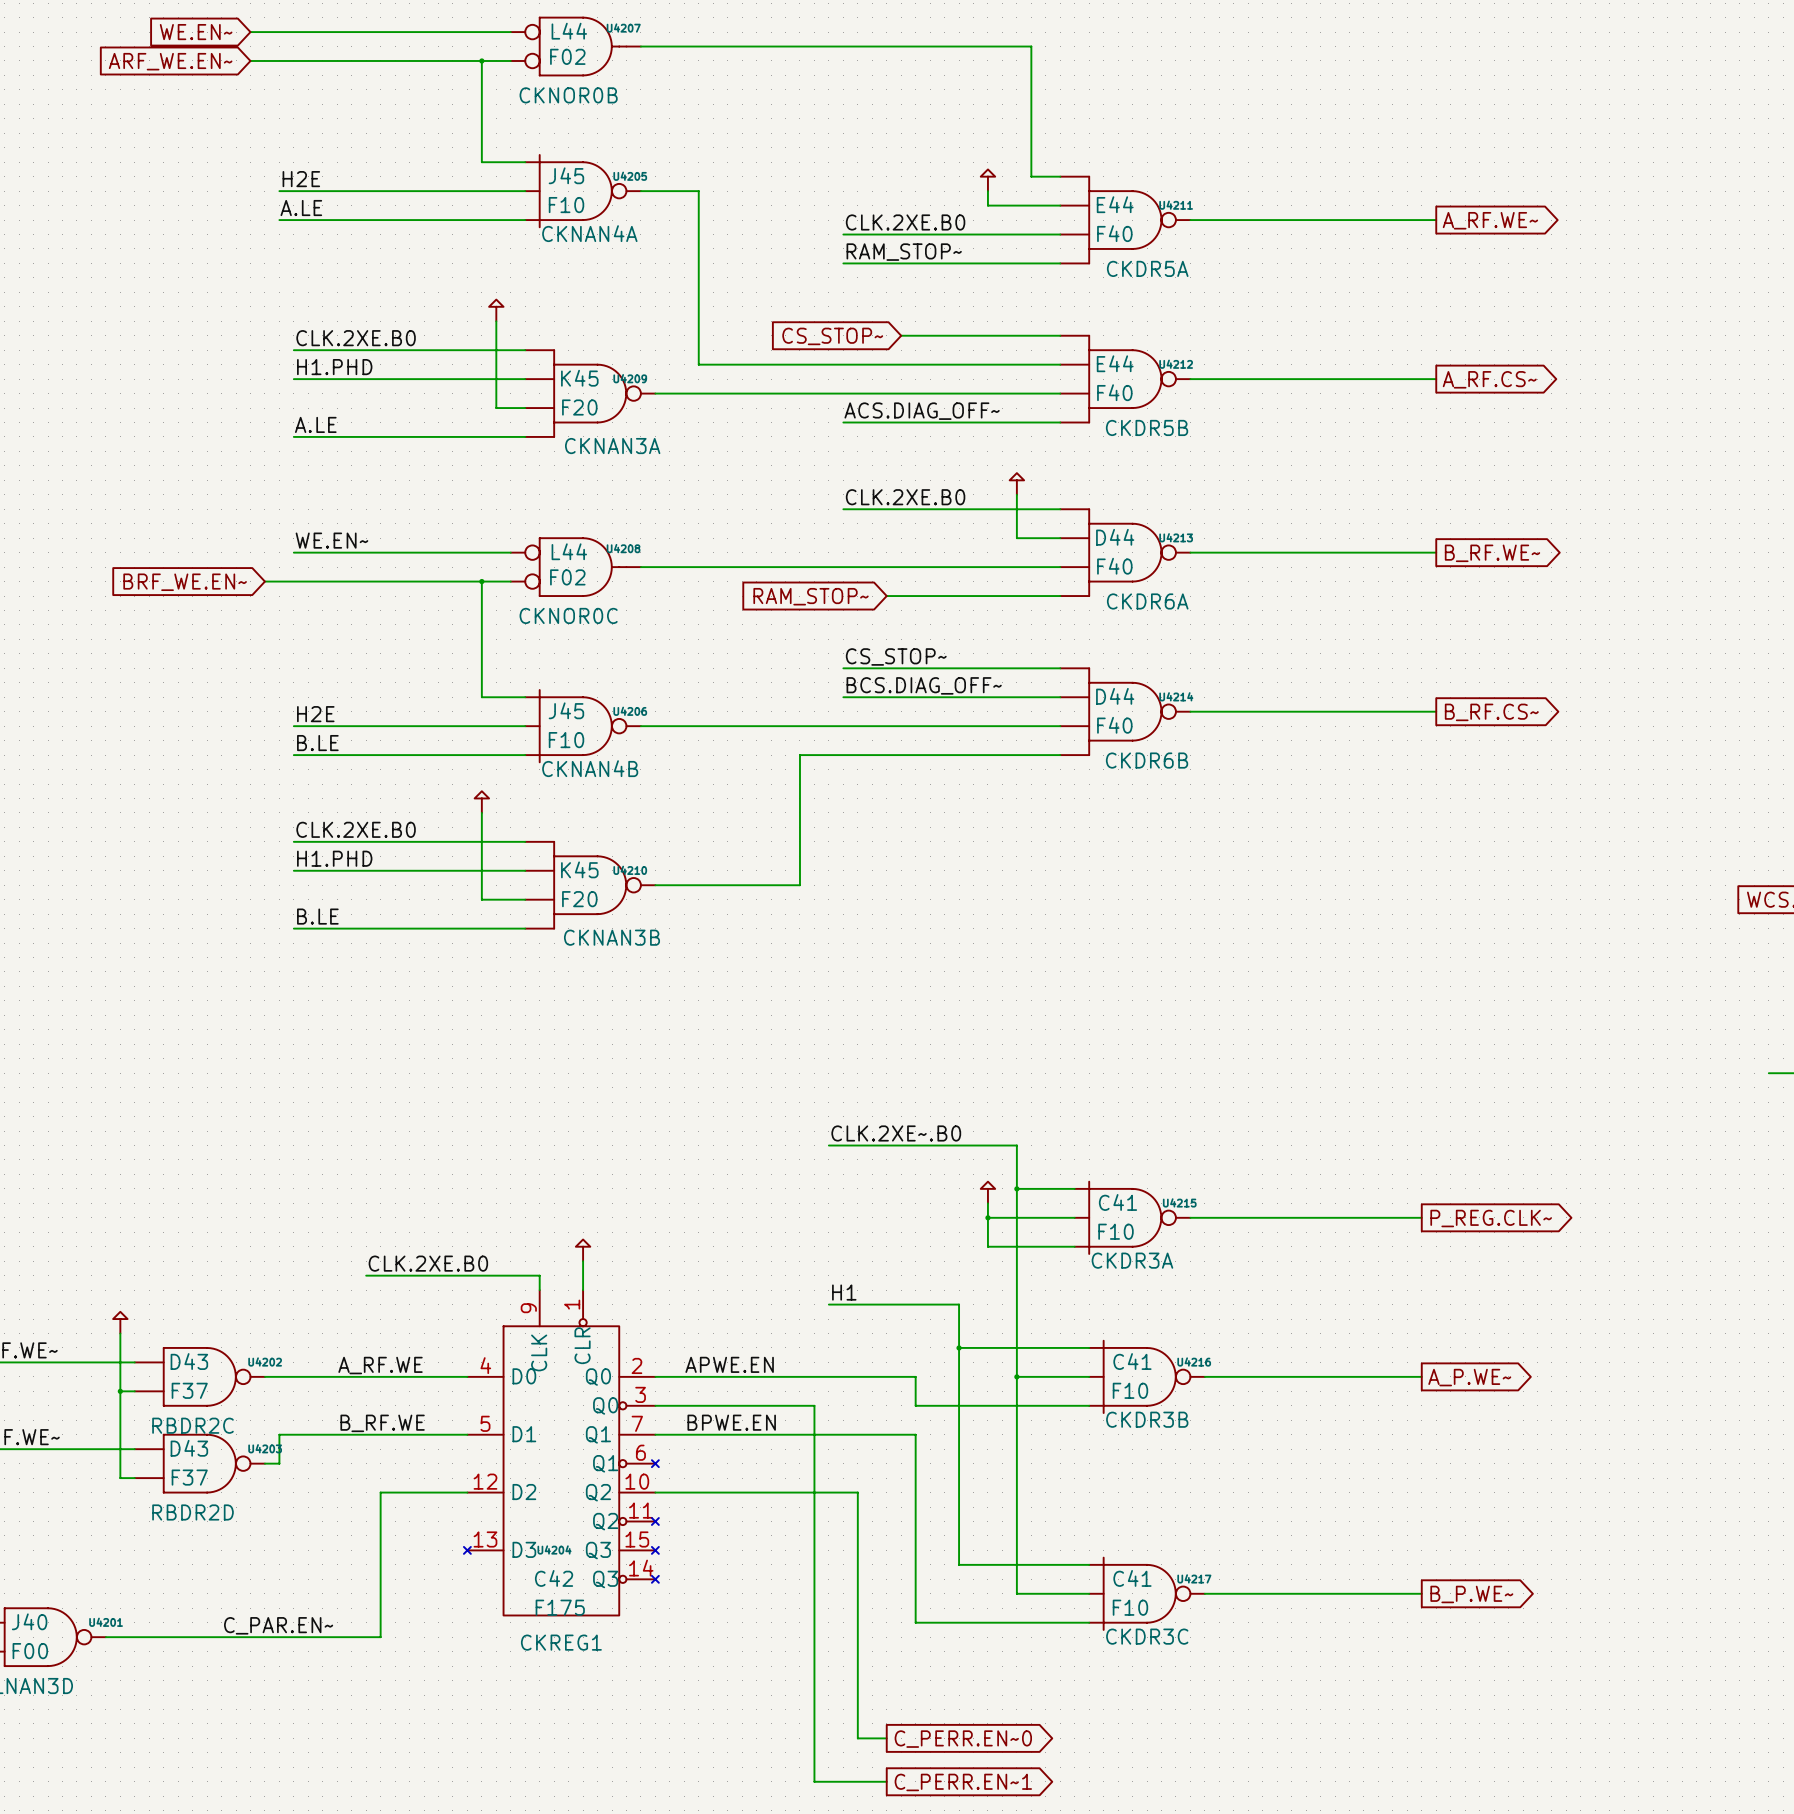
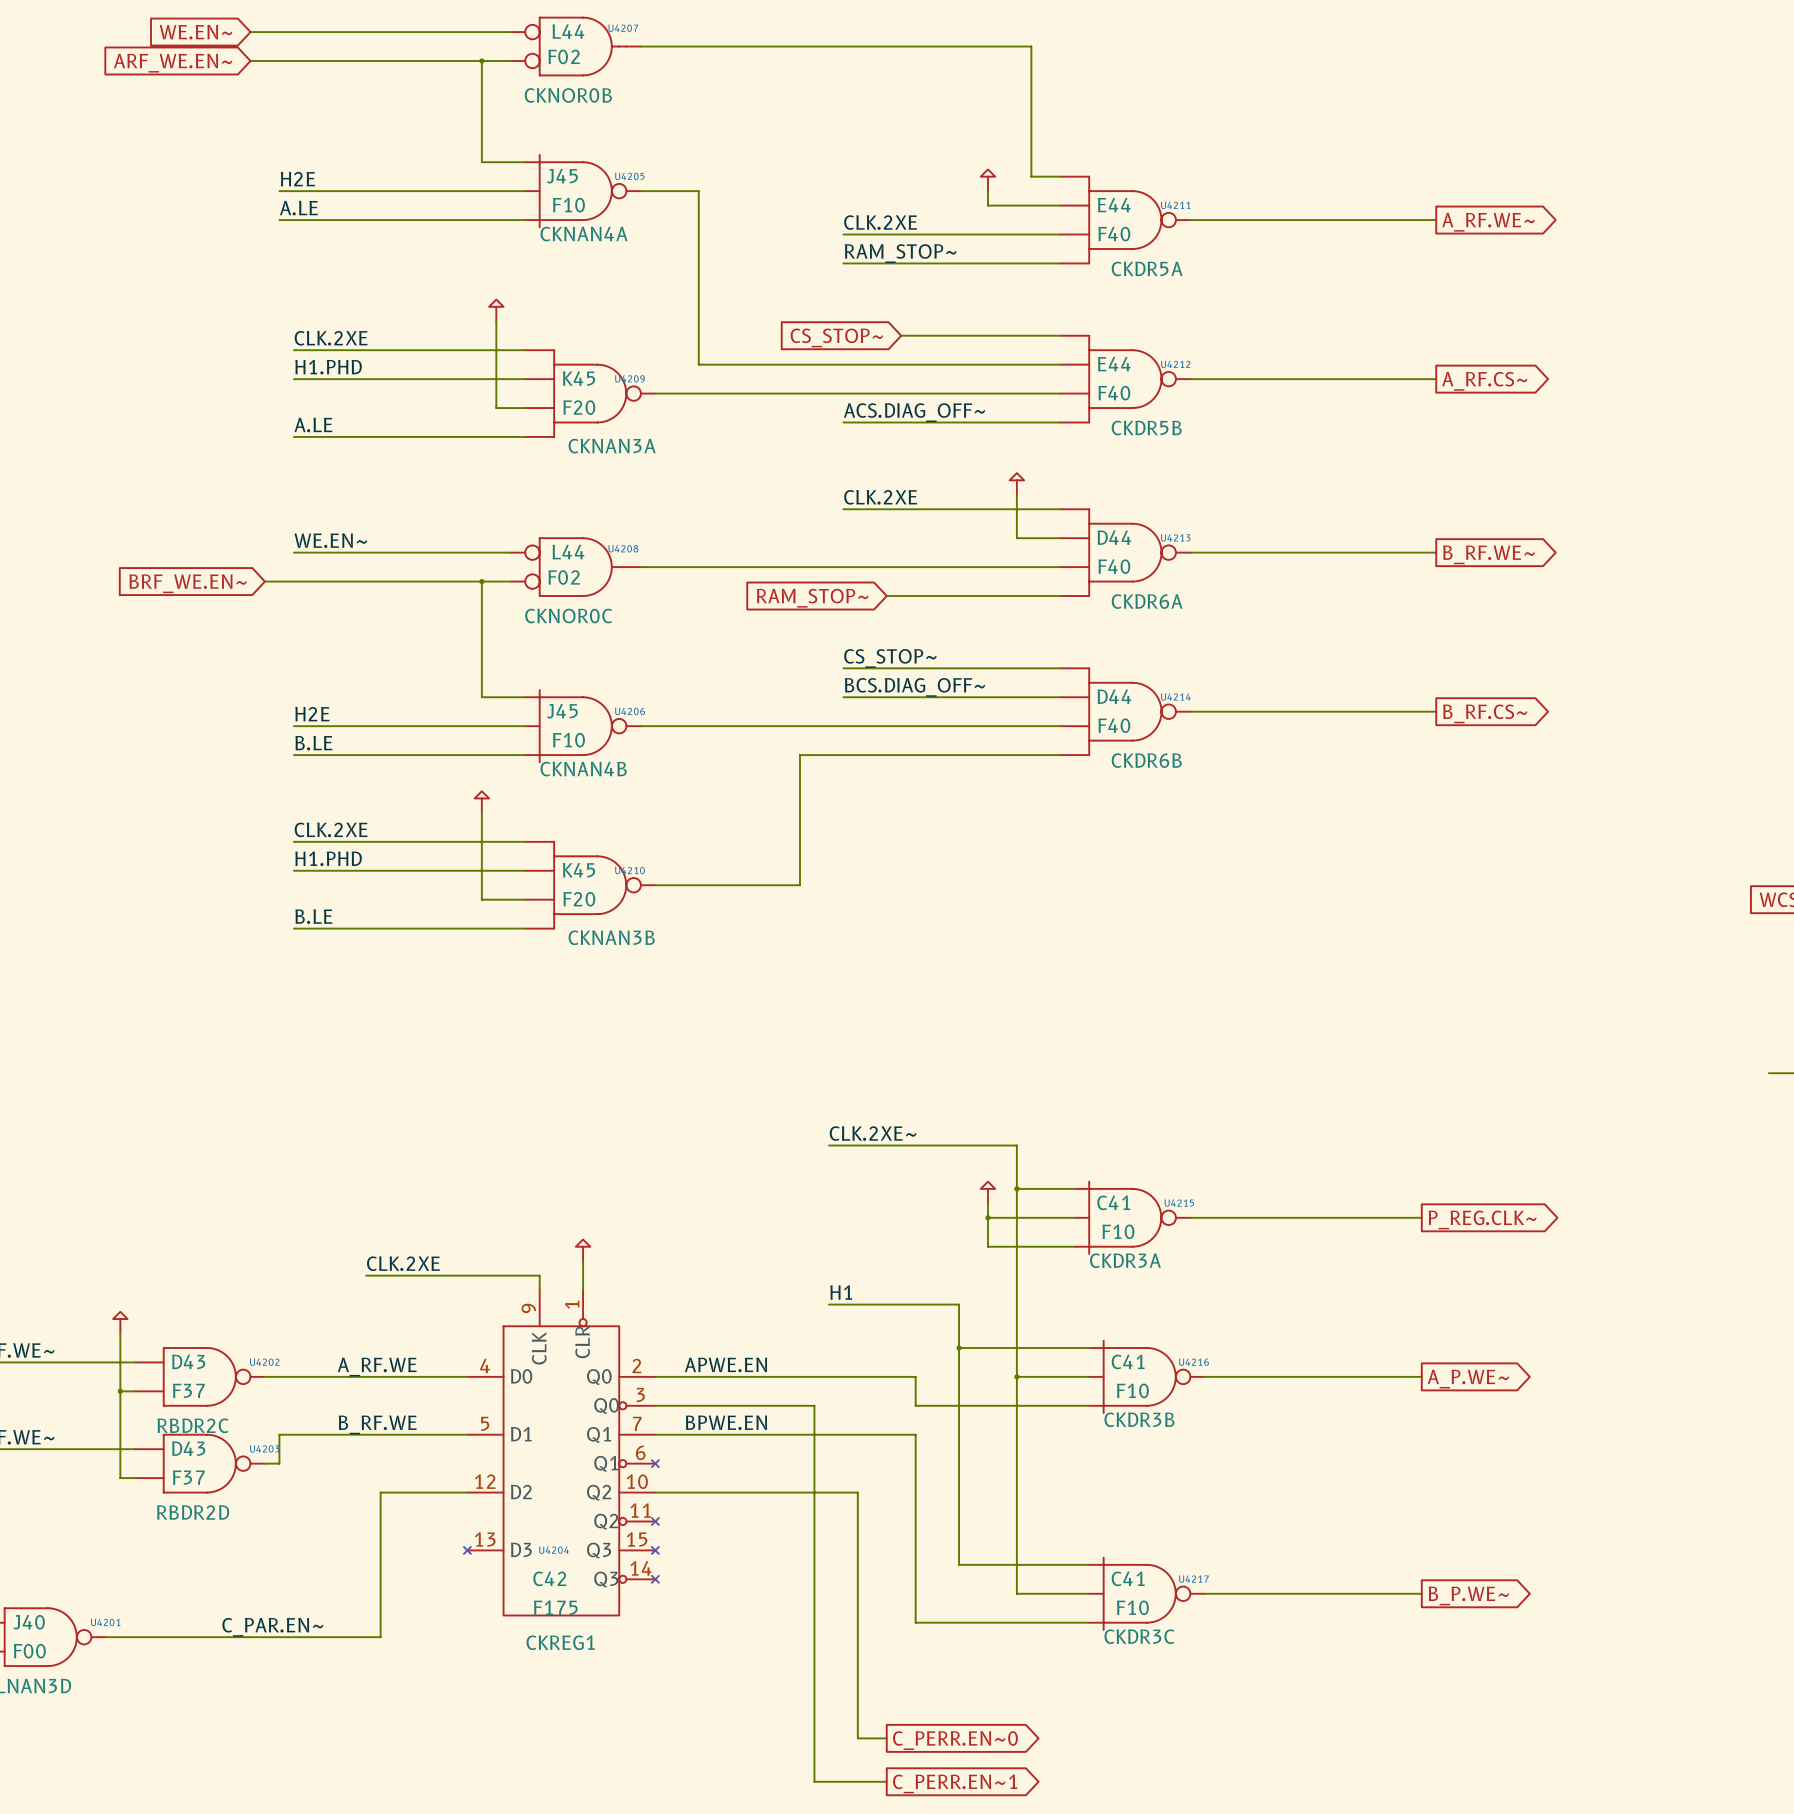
label: CLK.2XE.B0 (905, 222) -> CLK.2XE (880, 222)
label: CLK.2XE.B0 (356, 338) -> CLK.2XE (331, 338)
label: CLK.2XE.B0 (905, 497) -> CLK.2XE (880, 497)
label: CLK.2XE.B0 (356, 829) -> CLK.2XE (331, 829)
label: CLK.2XE~.B0 (896, 1133) -> CLK.2XE~ (873, 1133)
label: CLK.2XE.B0 (428, 1263) -> CLK.2XE (403, 1263)

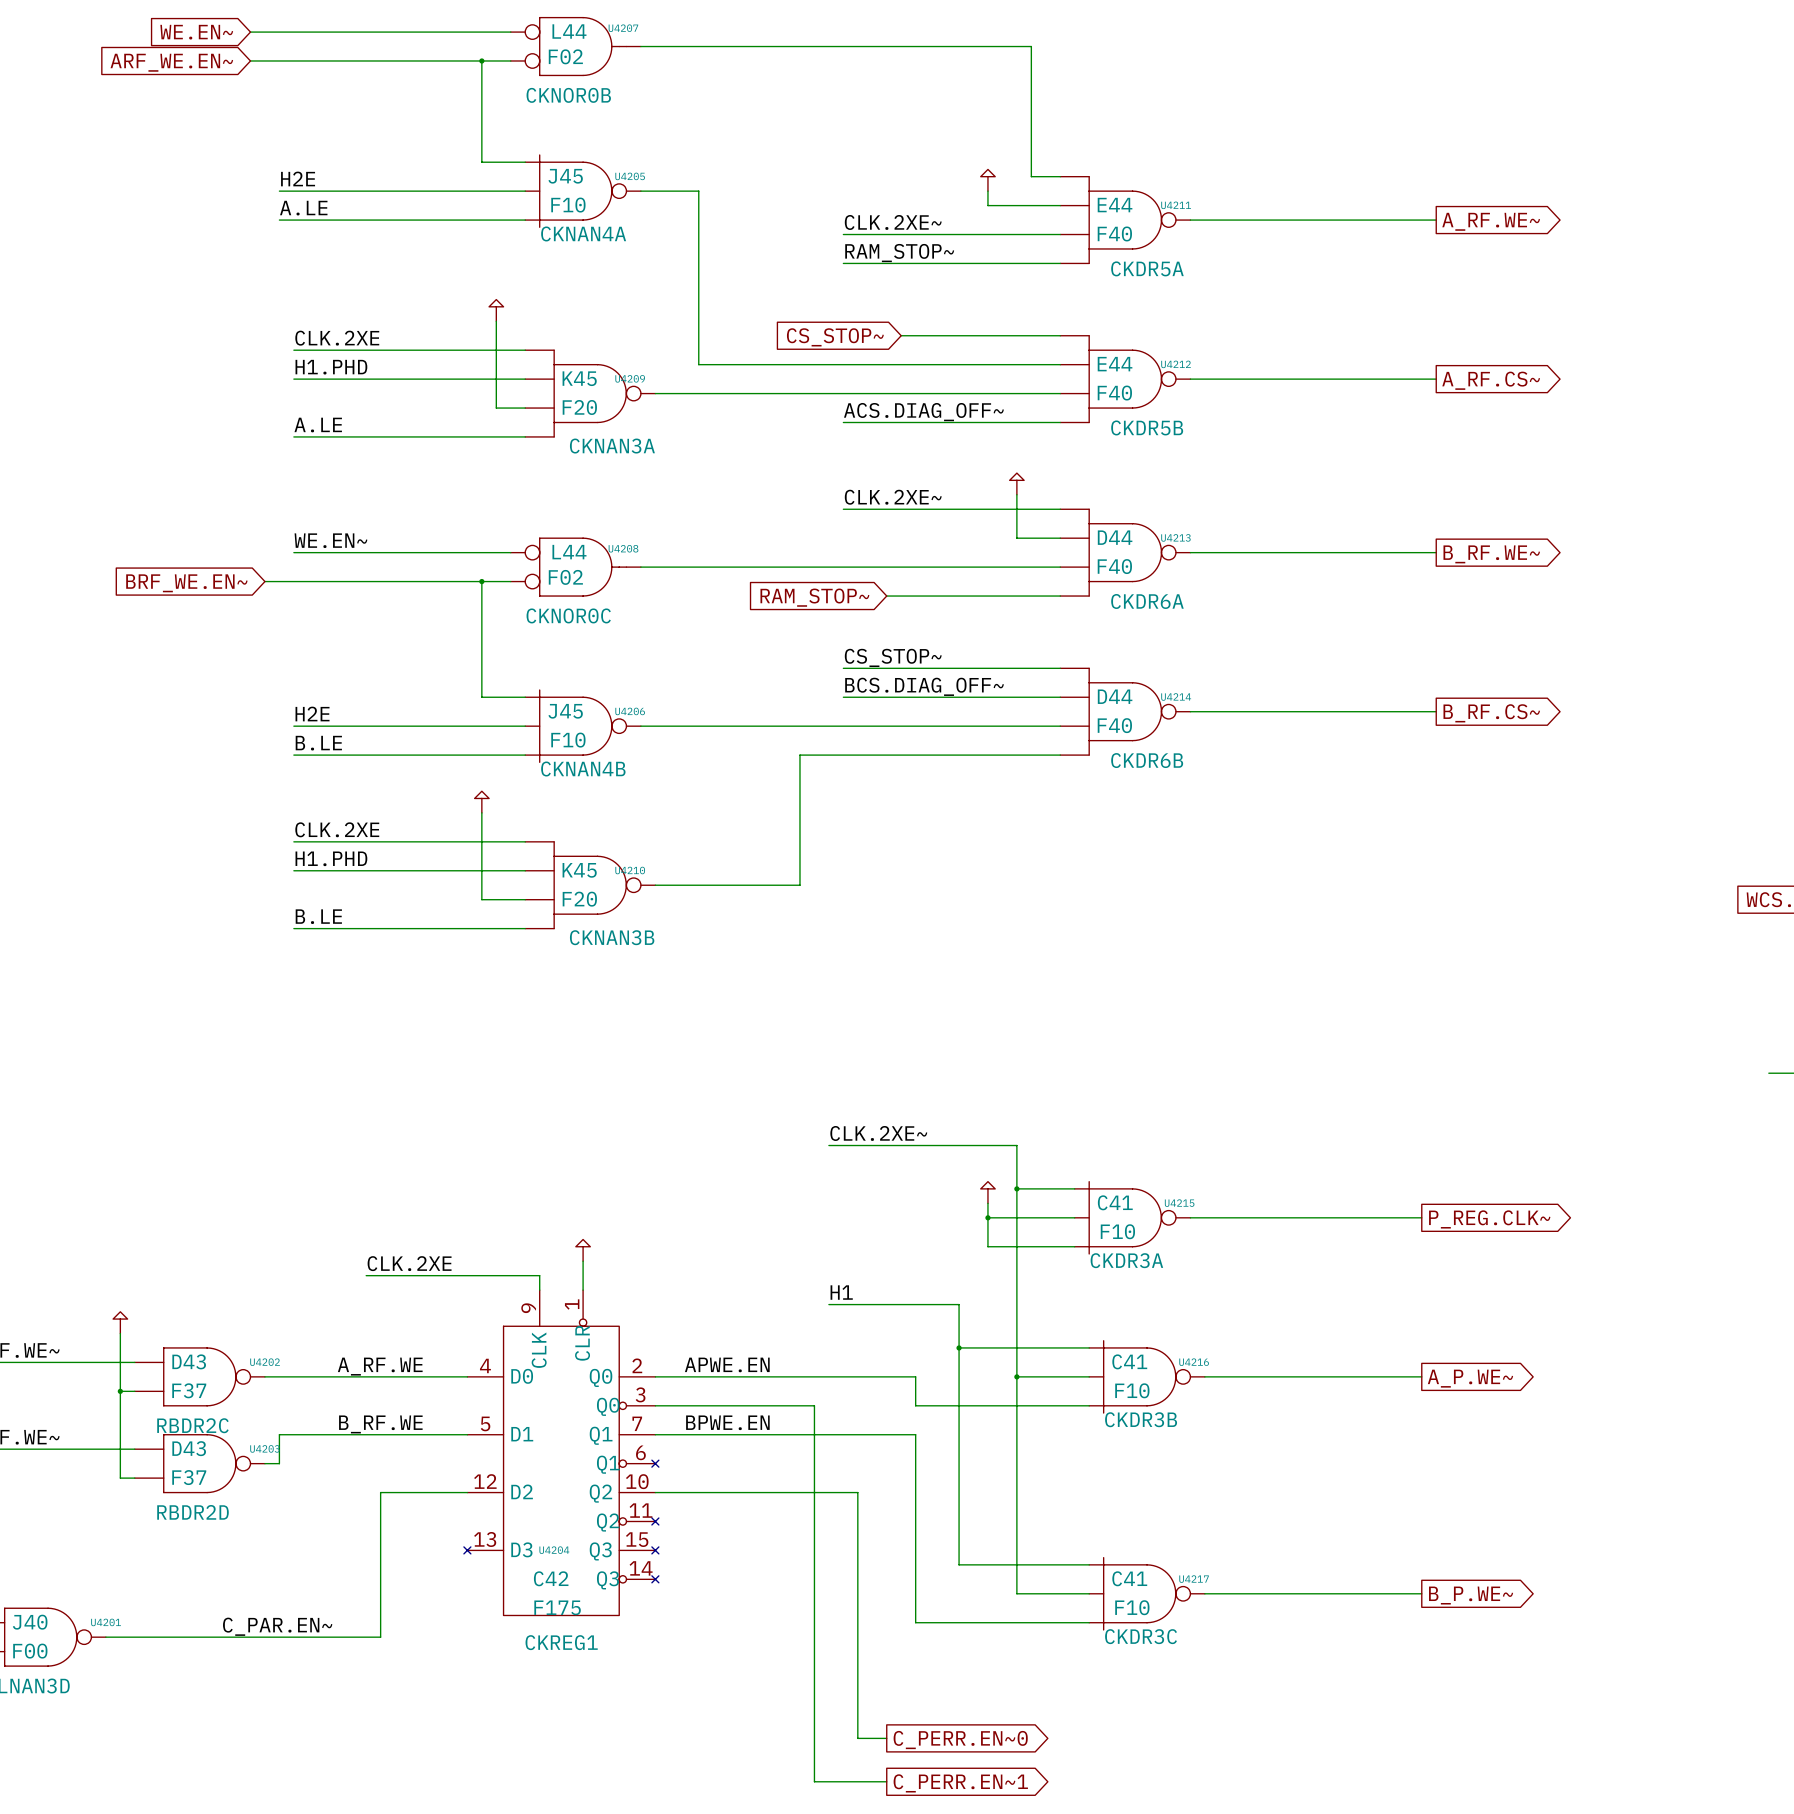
label: CLK.2XE (880, 222) -> CLK.2XE~ (893, 222)
label: CLK.2XE (880, 497) -> CLK.2XE~ (893, 497)

